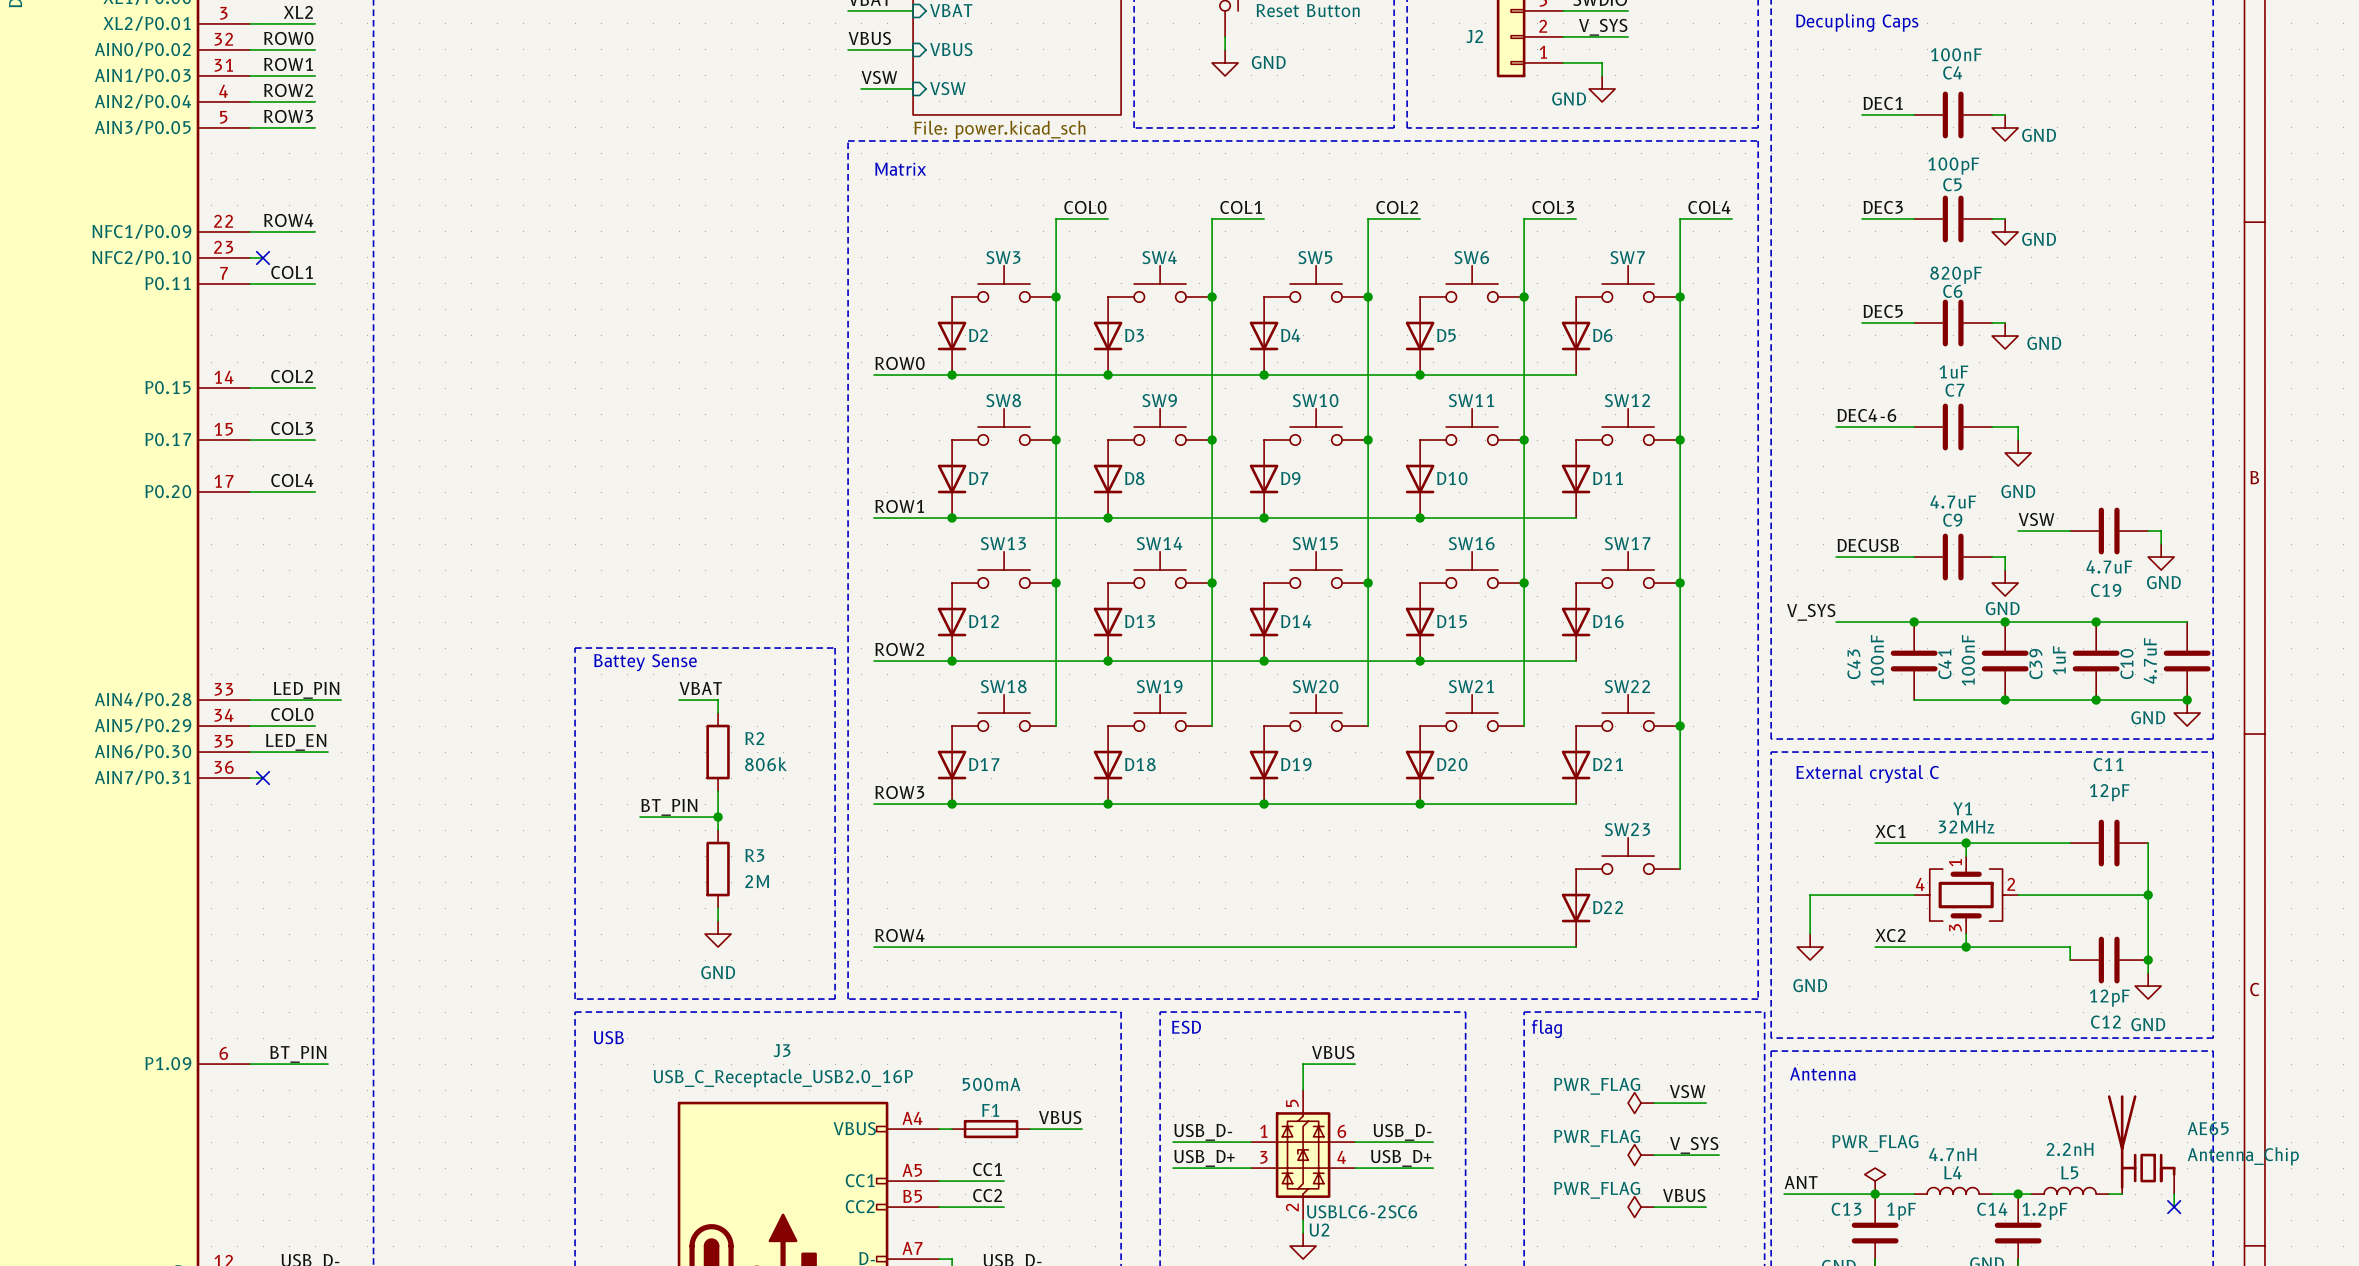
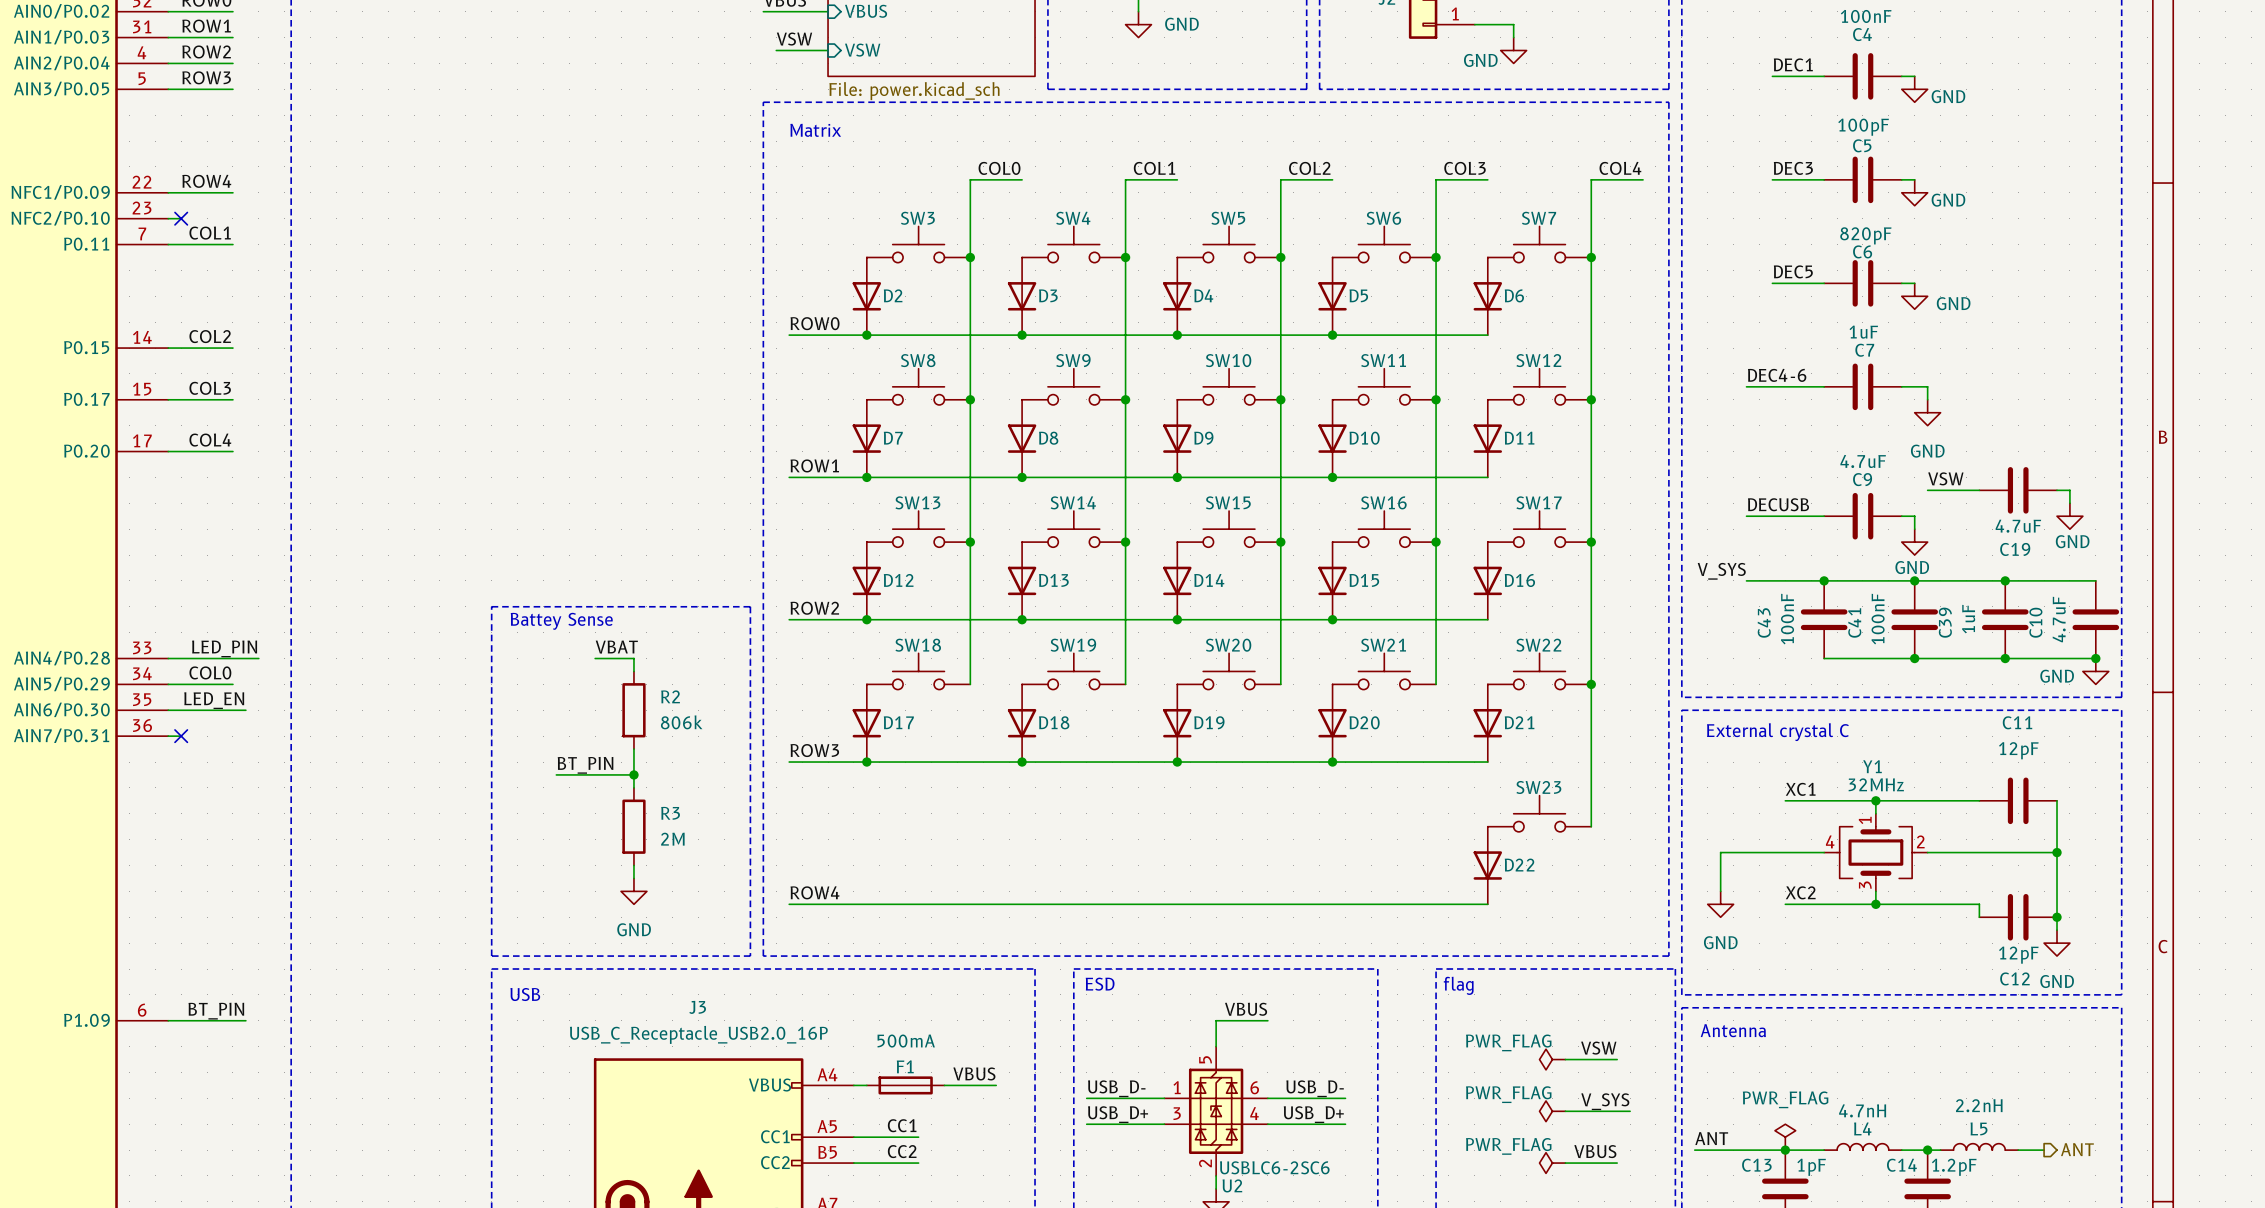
AE65: Antenna_Chip (2141, 1144) -> none
hierarchical label: none -> ANT (2077, 1149)
wire: none -> (2031, 1150) (2044, 1150)
wire: (2174, 1194) (2174, 1207) -> none
no-connect mark: (2174, 1207) -> none

